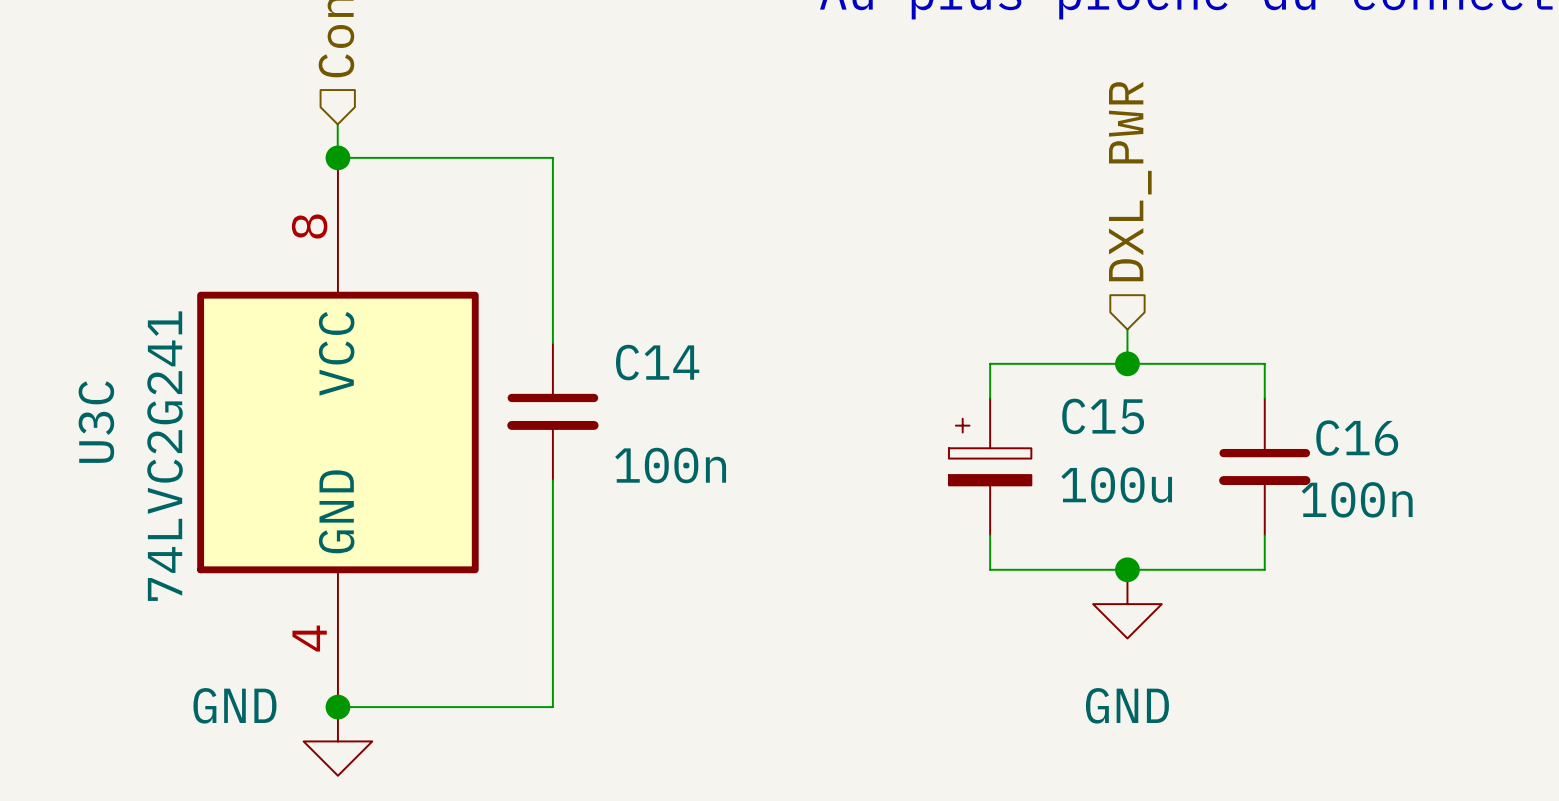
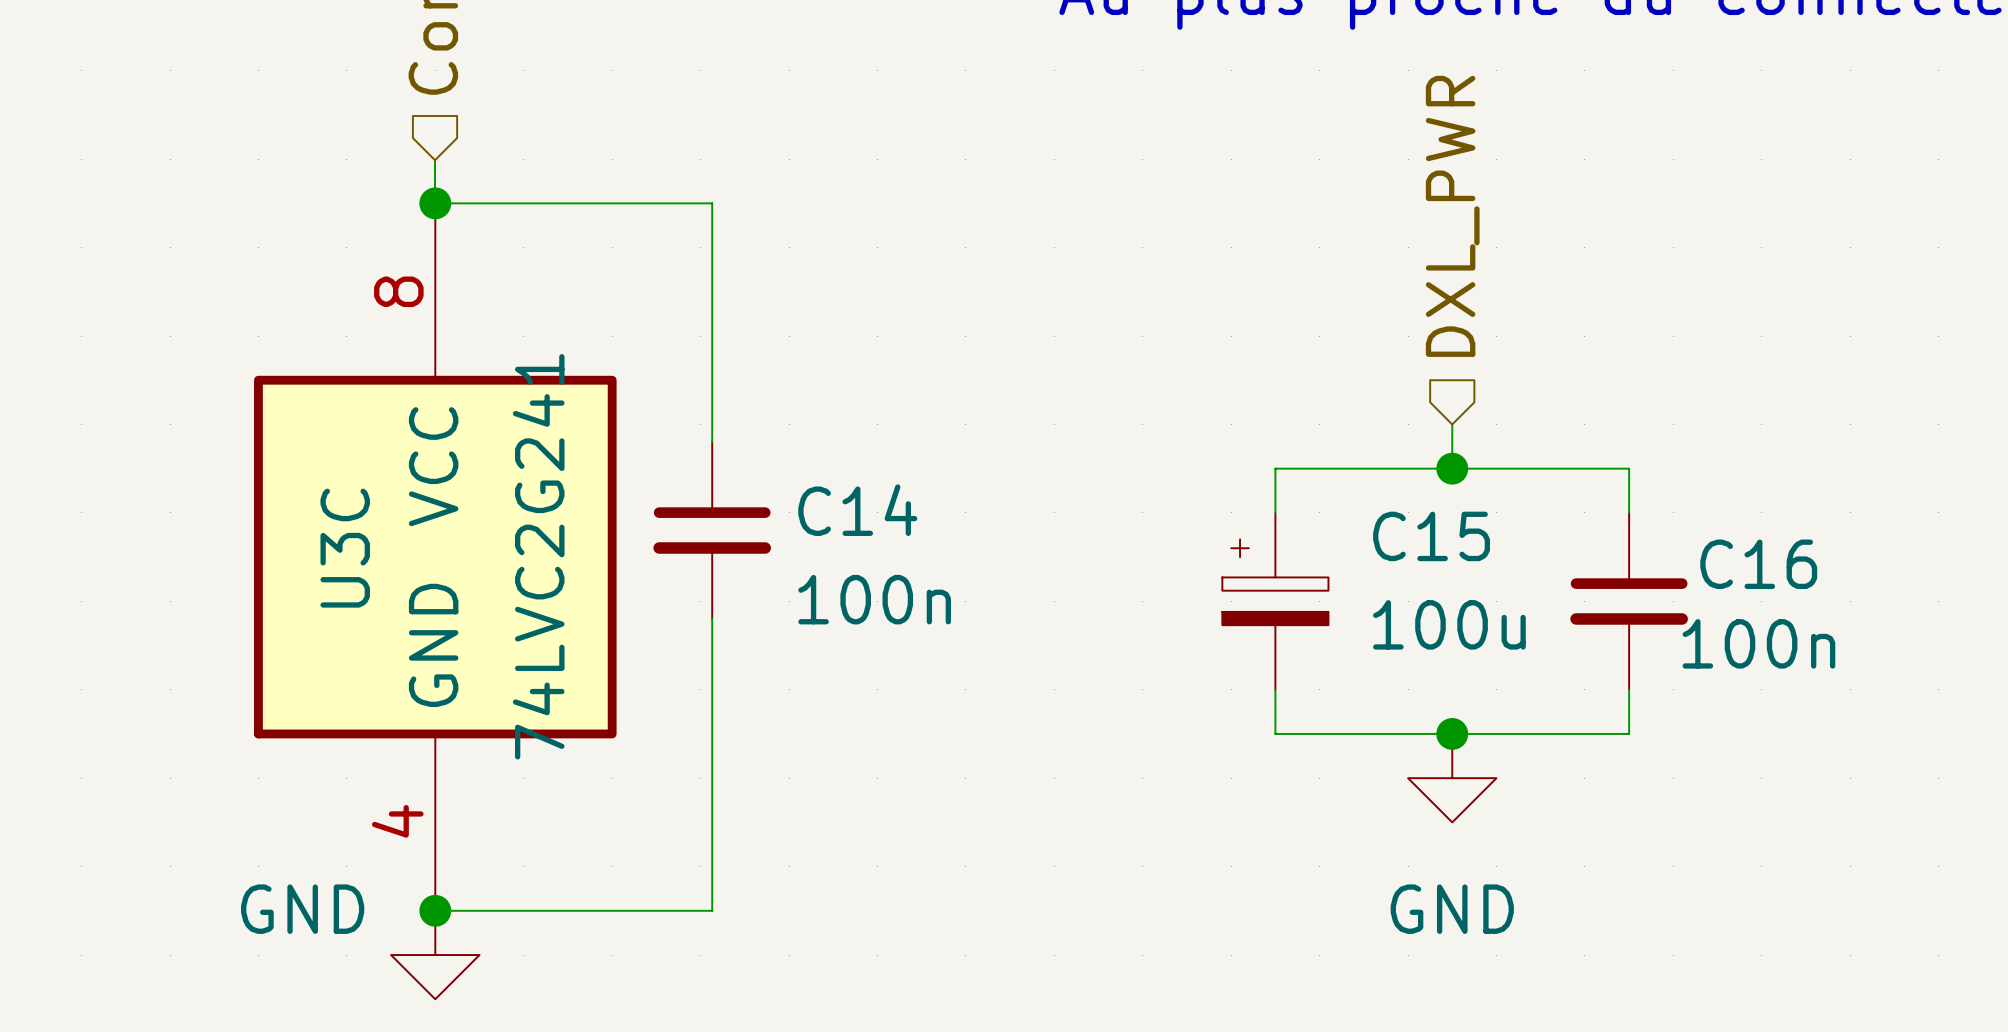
C14 name position: C14 (657, 362) -> C14 (857, 510)
U3C name position: U3C (96, 422) -> U3C (345, 548)
U3C value position: 74LVC2G241 (165, 456) -> 74LVC2G241 (538, 556)

